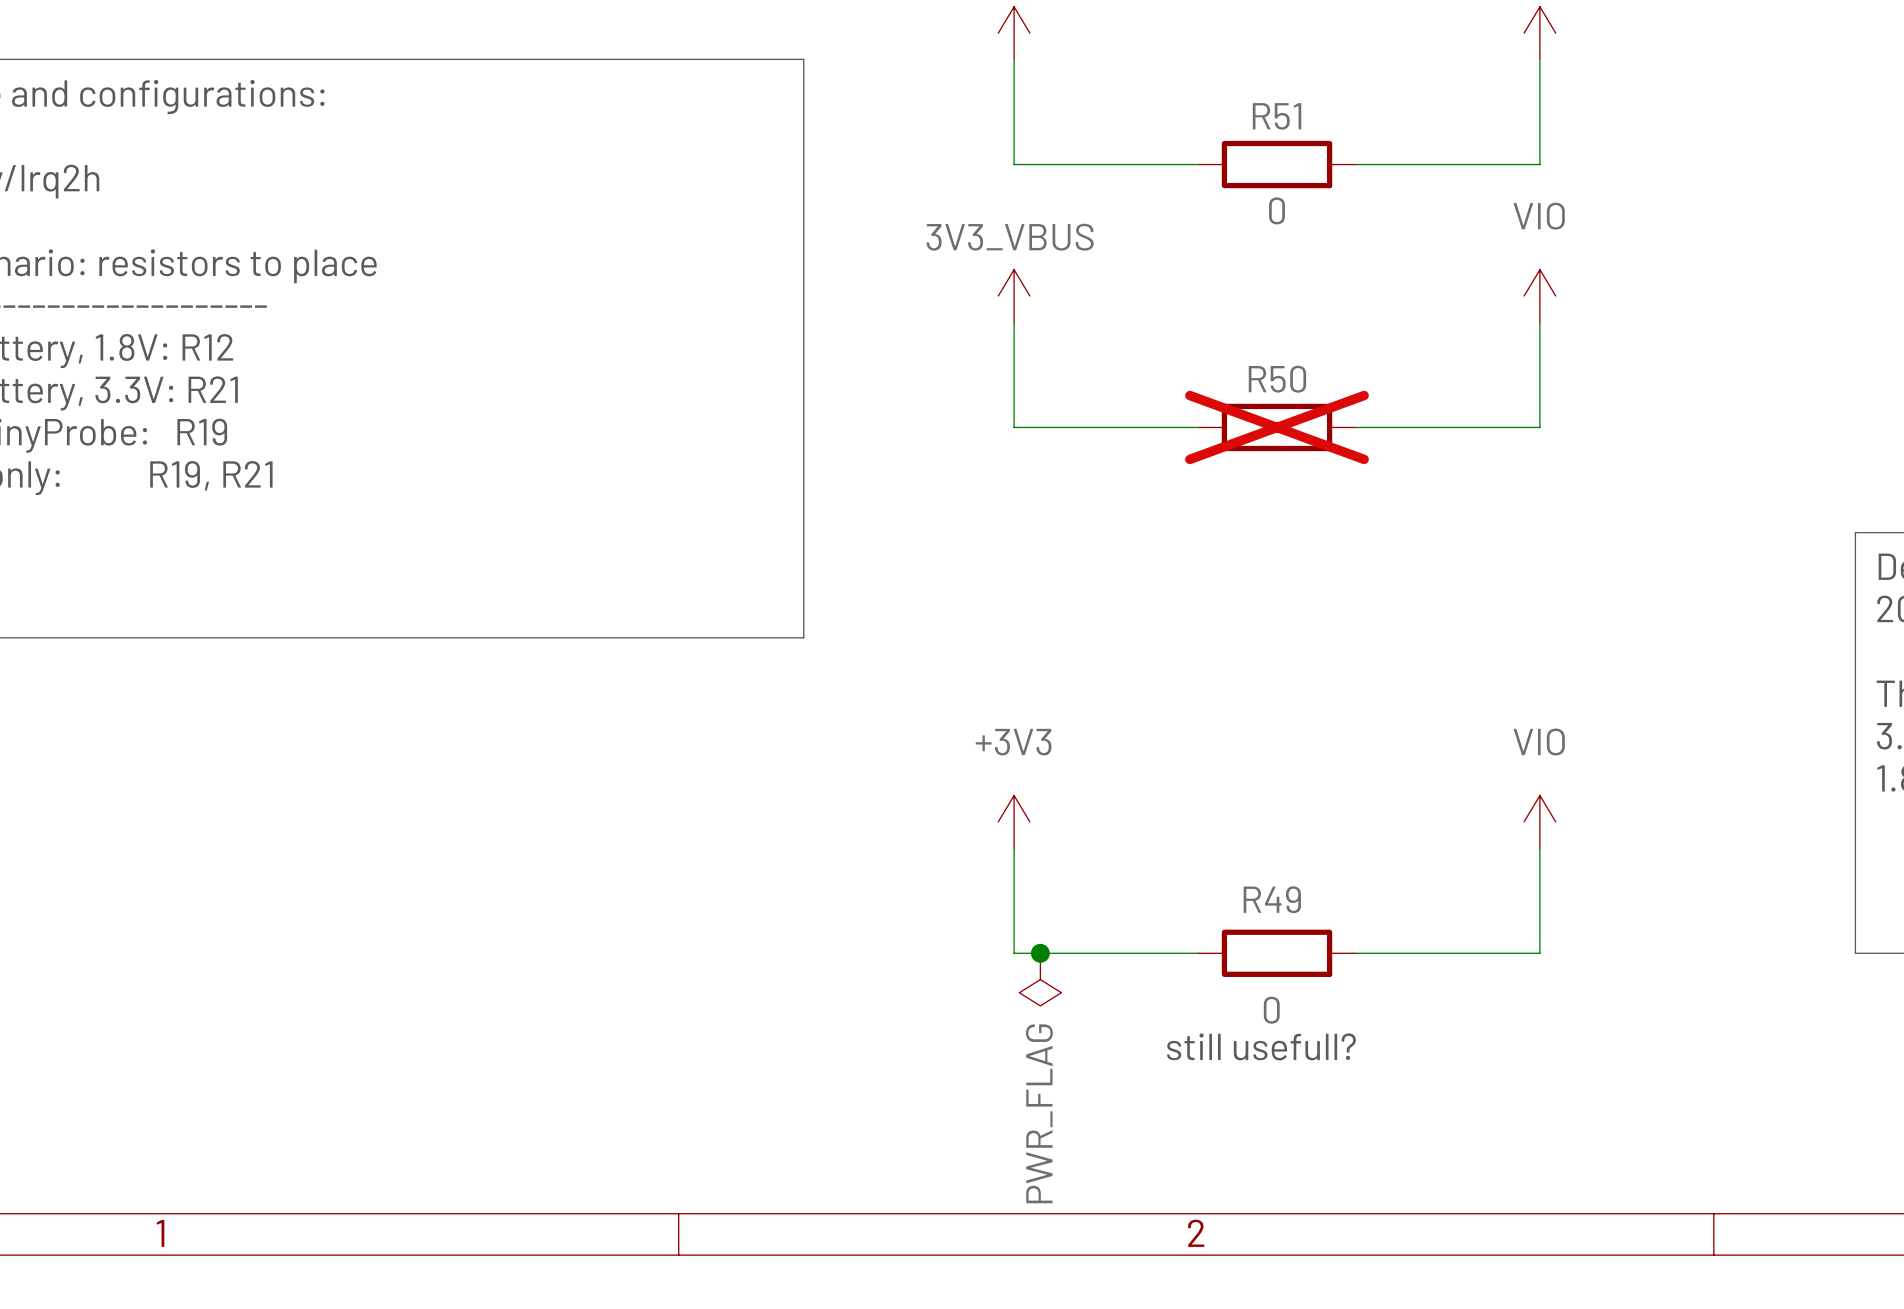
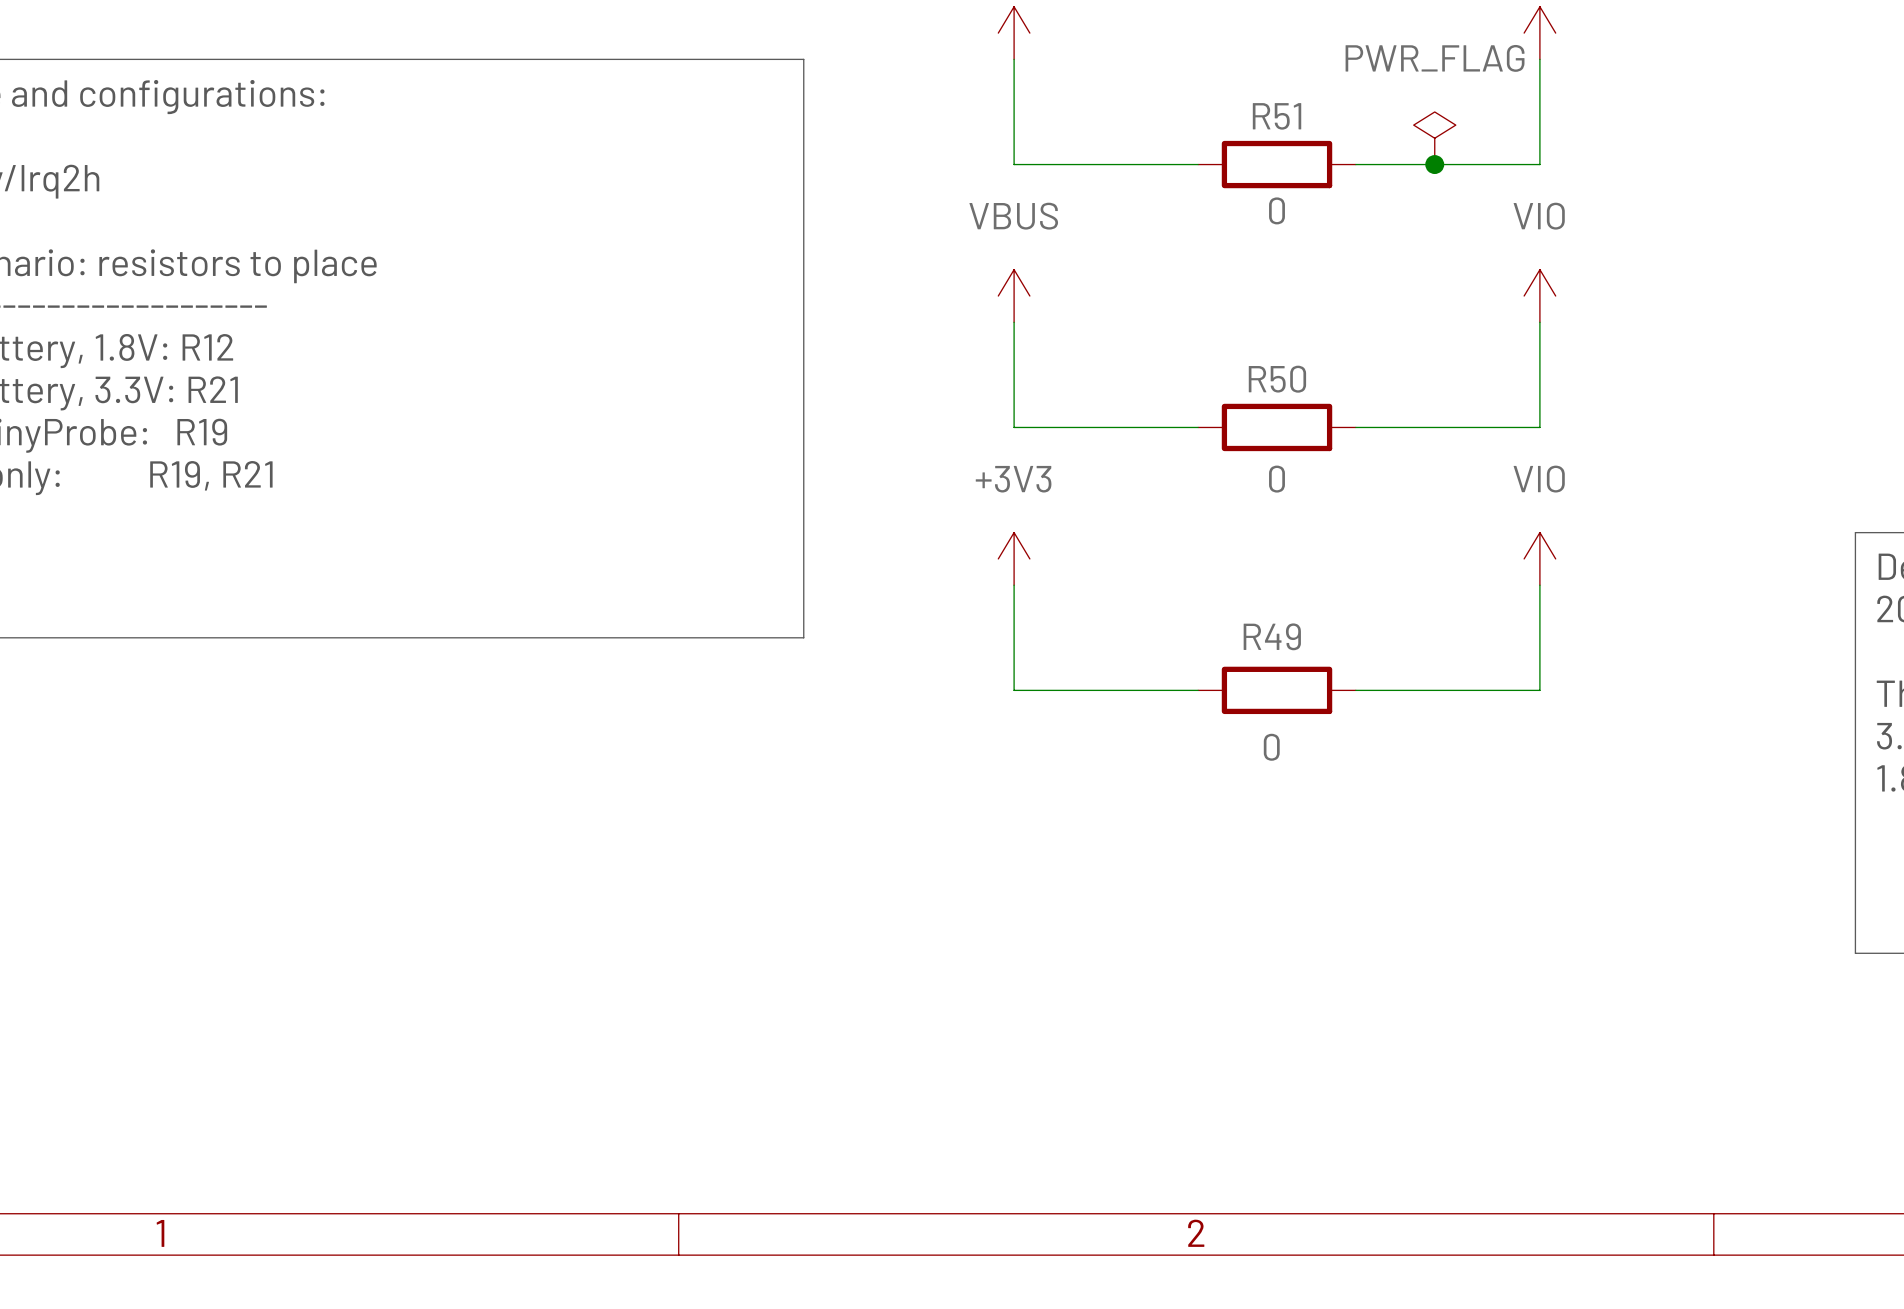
power symbol: none -> PWR_FLAG (1434, 138)
junction: none -> (1434, 164)
power symbol: 3V3_VBUS (1014, 296) -> VBUS (1014, 296)
R50 do-not-place cross: (1277, 427) -> none
R50 value: none -> 0 (1277, 479)
power symbol position: +3V3 (1014, 821) -> +3V3 (1014, 558)
power symbol position: VIO (1539, 821) -> VIO (1539, 558)
wire: (1014, 848) (1014, 953) (1198, 953) -> (1014, 585) (1014, 690) (1198, 690)
wire: (1539, 848) (1539, 953) (1355, 953) -> (1539, 585) (1539, 690) (1355, 690)
junction: (1040, 953) -> none
R49 position: (1277, 953) -> (1277, 690)
power symbol: PWR_FLAG (1040, 979) -> none
text: still usefull? (1261, 1046) -> none

